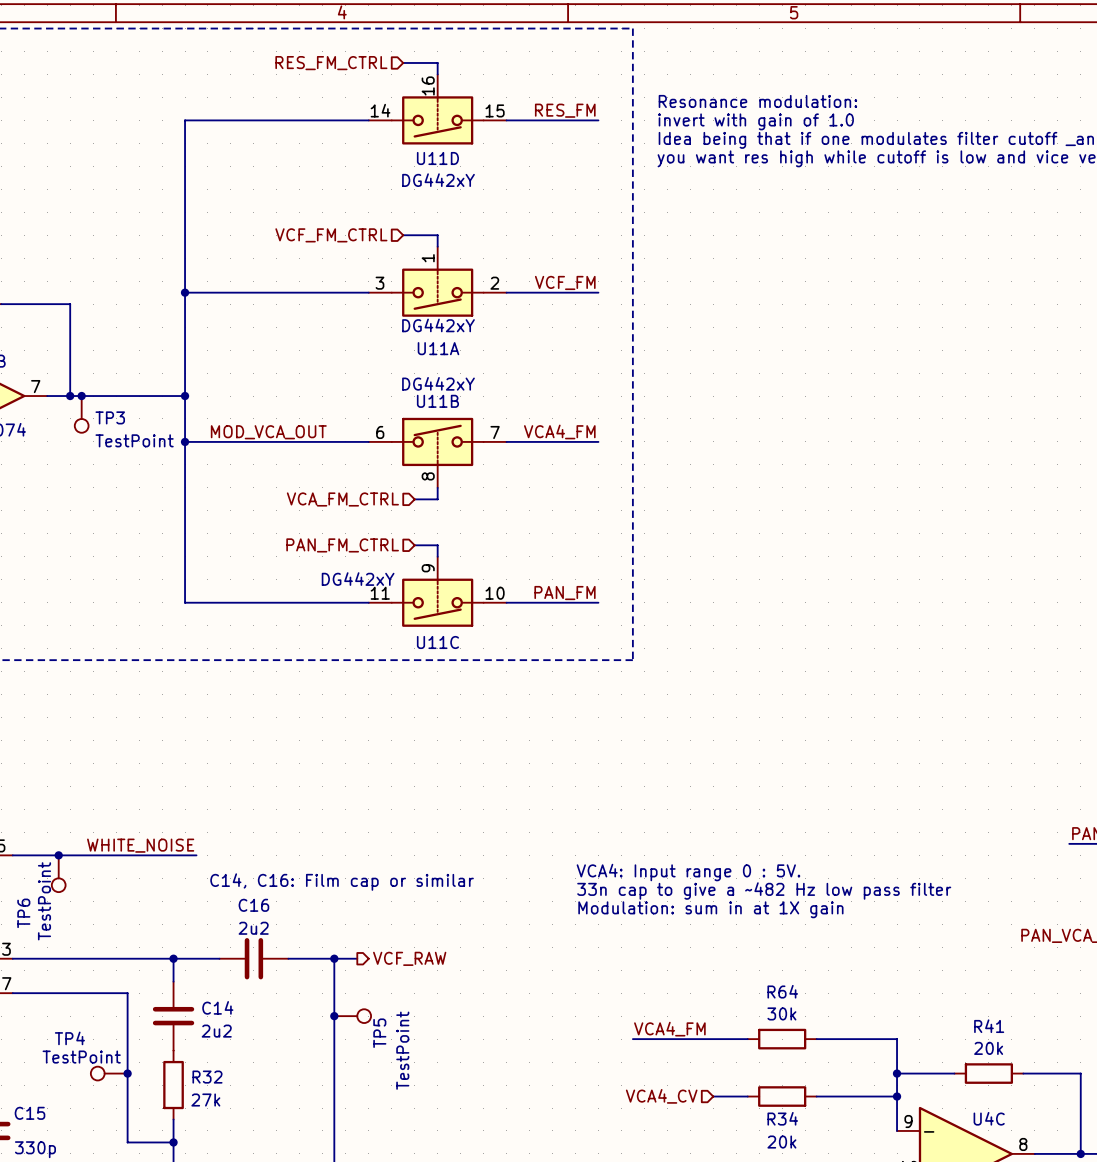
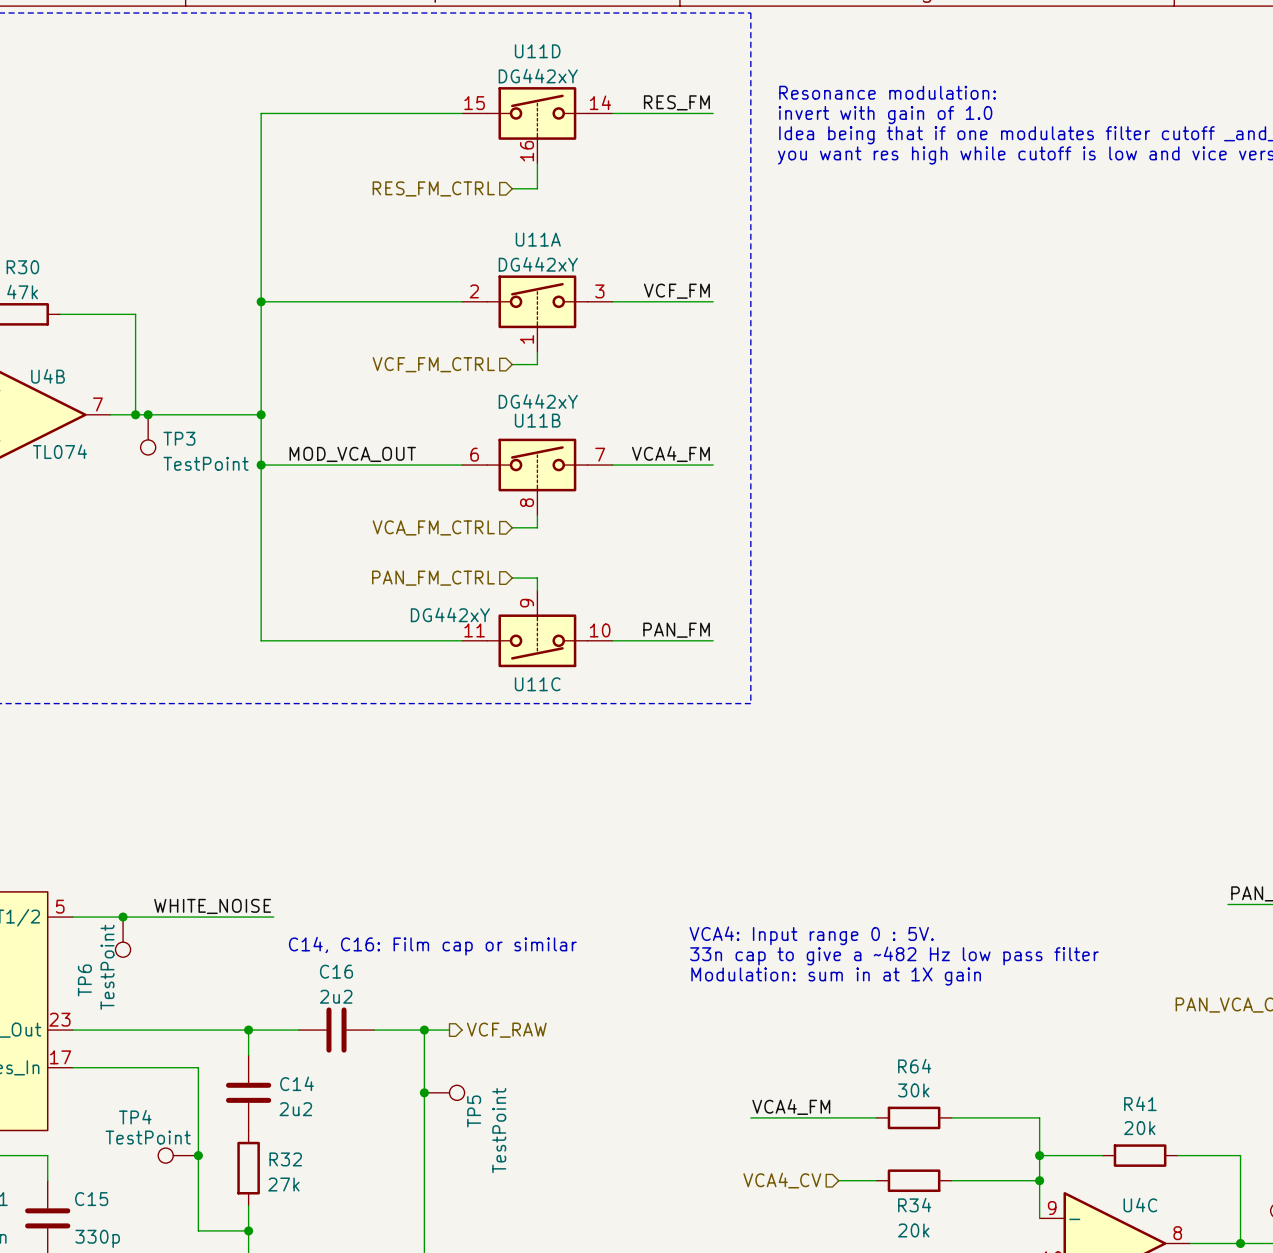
wire: (403, 62) (437, 62) (437, 74) -> none
hierarchical label position: RES_FM_CTRL (331, 63) -> RES_FM_CTRL (433, 188)
U11D rotation: 0° (437, 120) -> 180° (537, 113)
wire: none -> (537, 163) (537, 188) (512, 188)
U11D value position: DG442xY (438, 180) -> DG442xY (538, 76)
hierarchical label position: VCF_FM_CTRL (331, 235) -> VCF_FM_CTRL (433, 364)
wire: (403, 235) (437, 235) (437, 246) -> none
U11A rotation: 0° (437, 292) -> 180° (537, 301)
wire: none -> (537, 352) (537, 364) (512, 364)

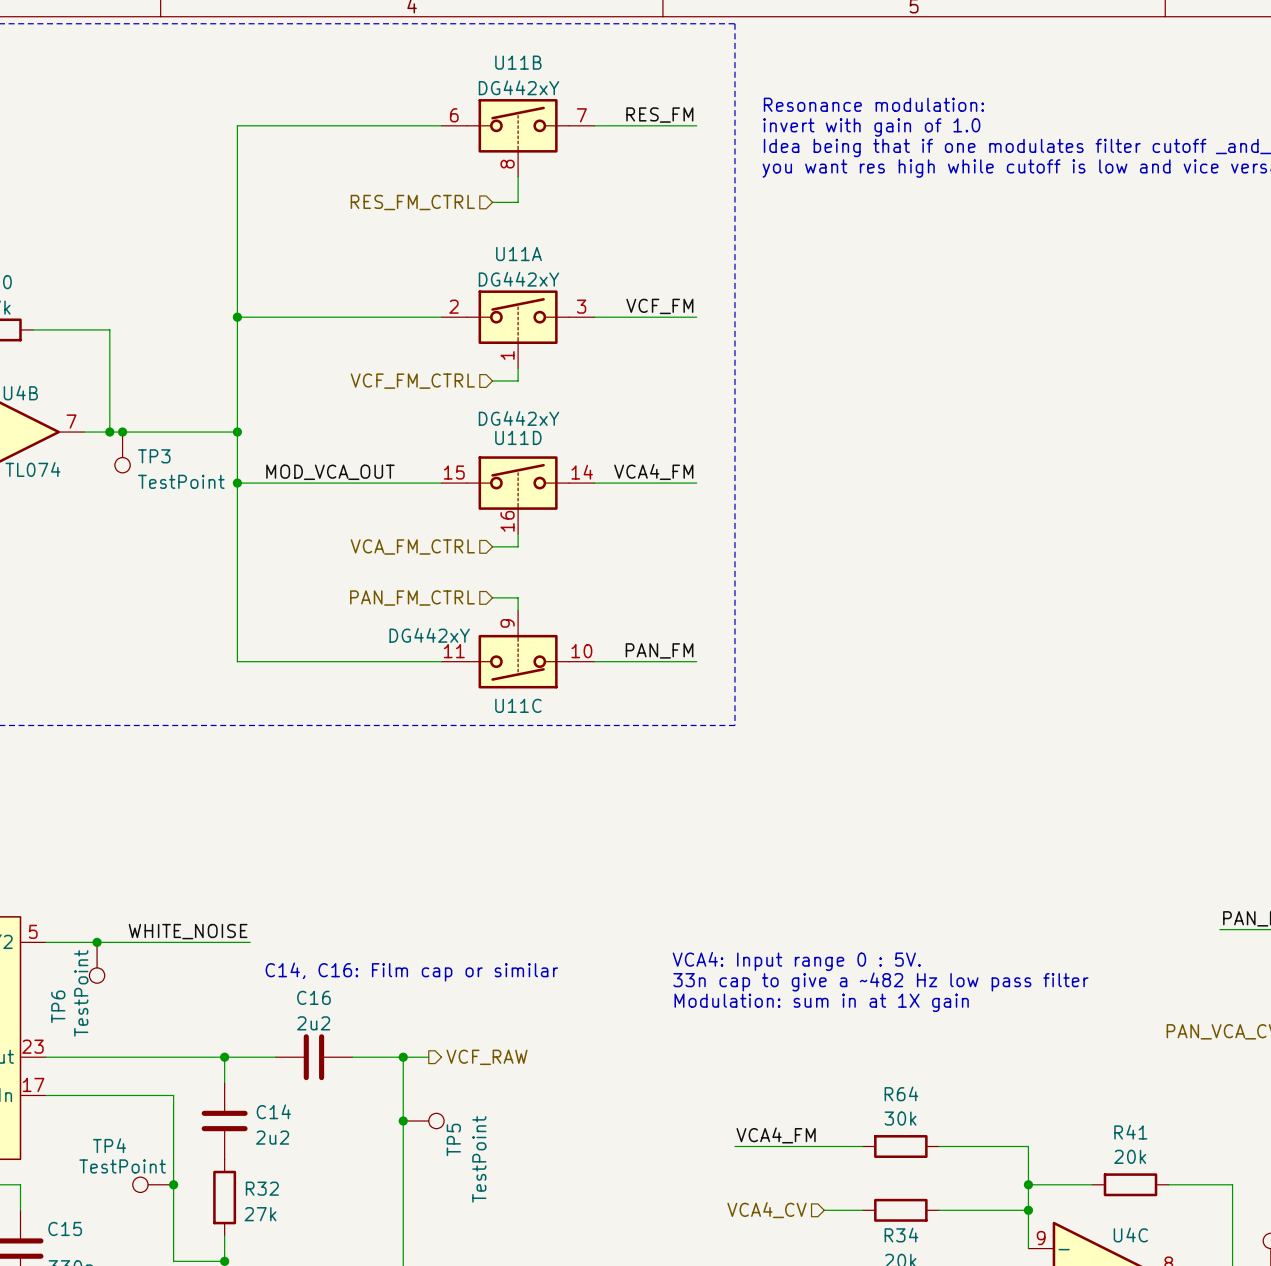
U11D name position: U11D (537, 51) -> U11D (518, 437)
U11D position: (537, 125) -> (518, 495)
U11B name position: U11B (537, 420) -> U11B (518, 62)
U11B position: (537, 476) -> (518, 137)

